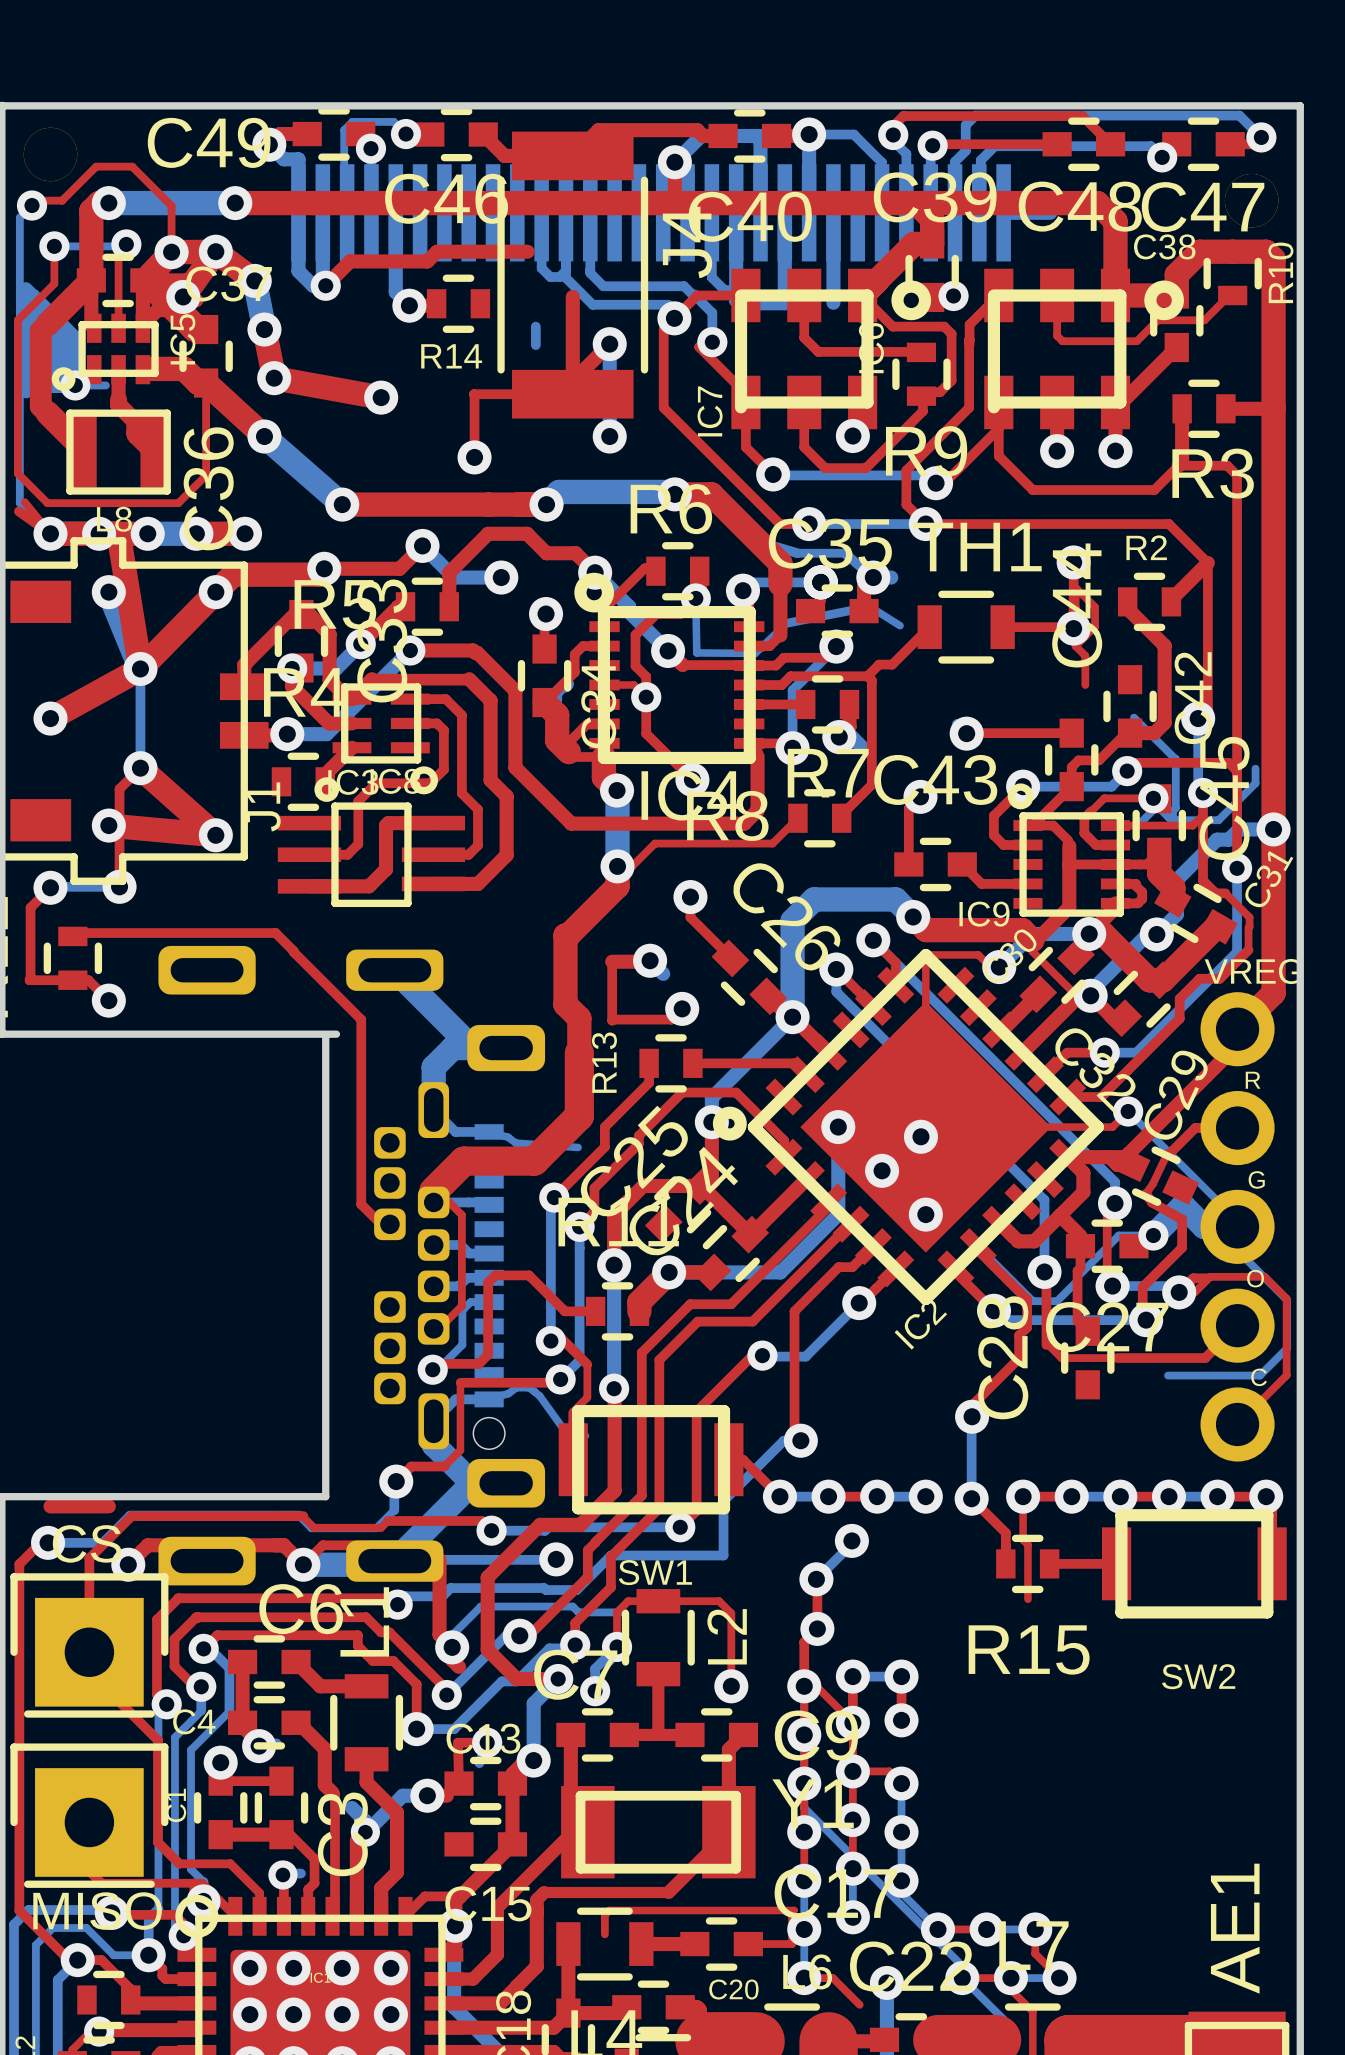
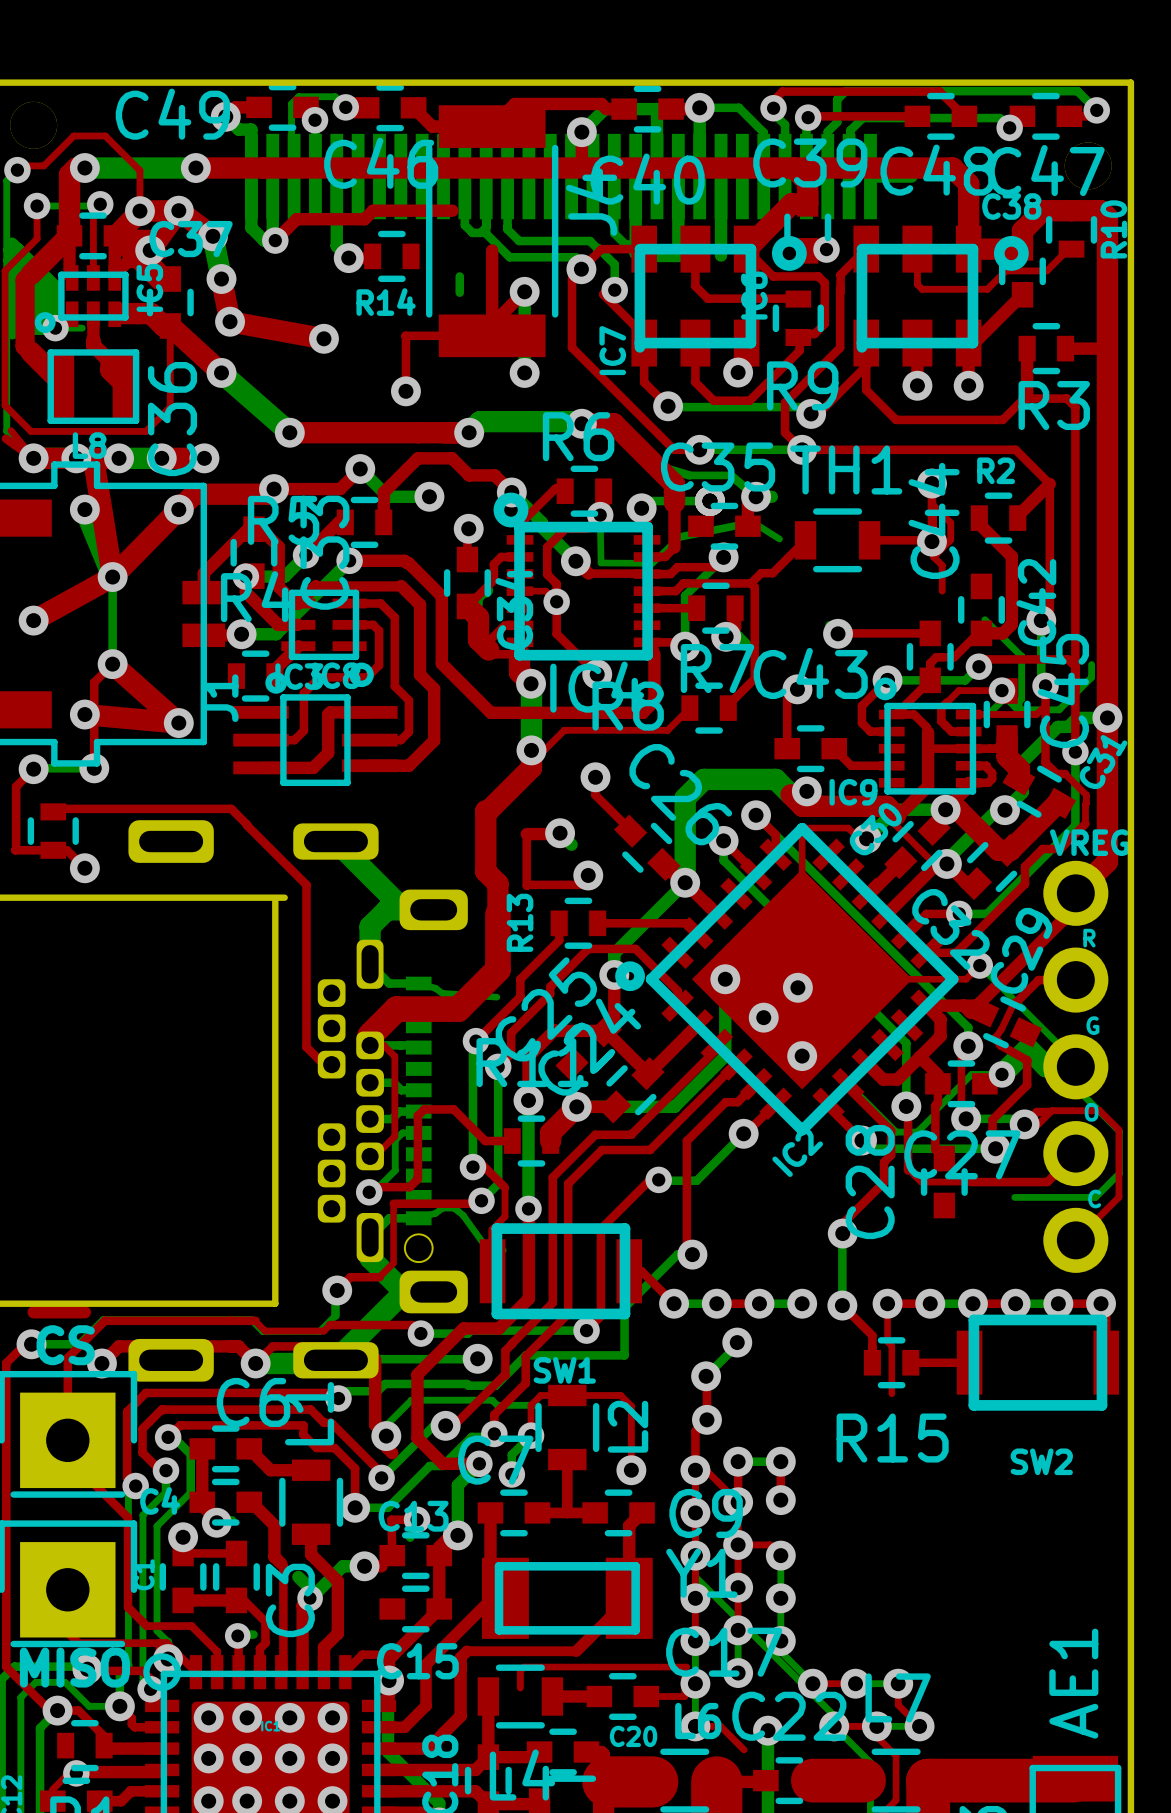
via position: (913, 916) -> (806, 791)

